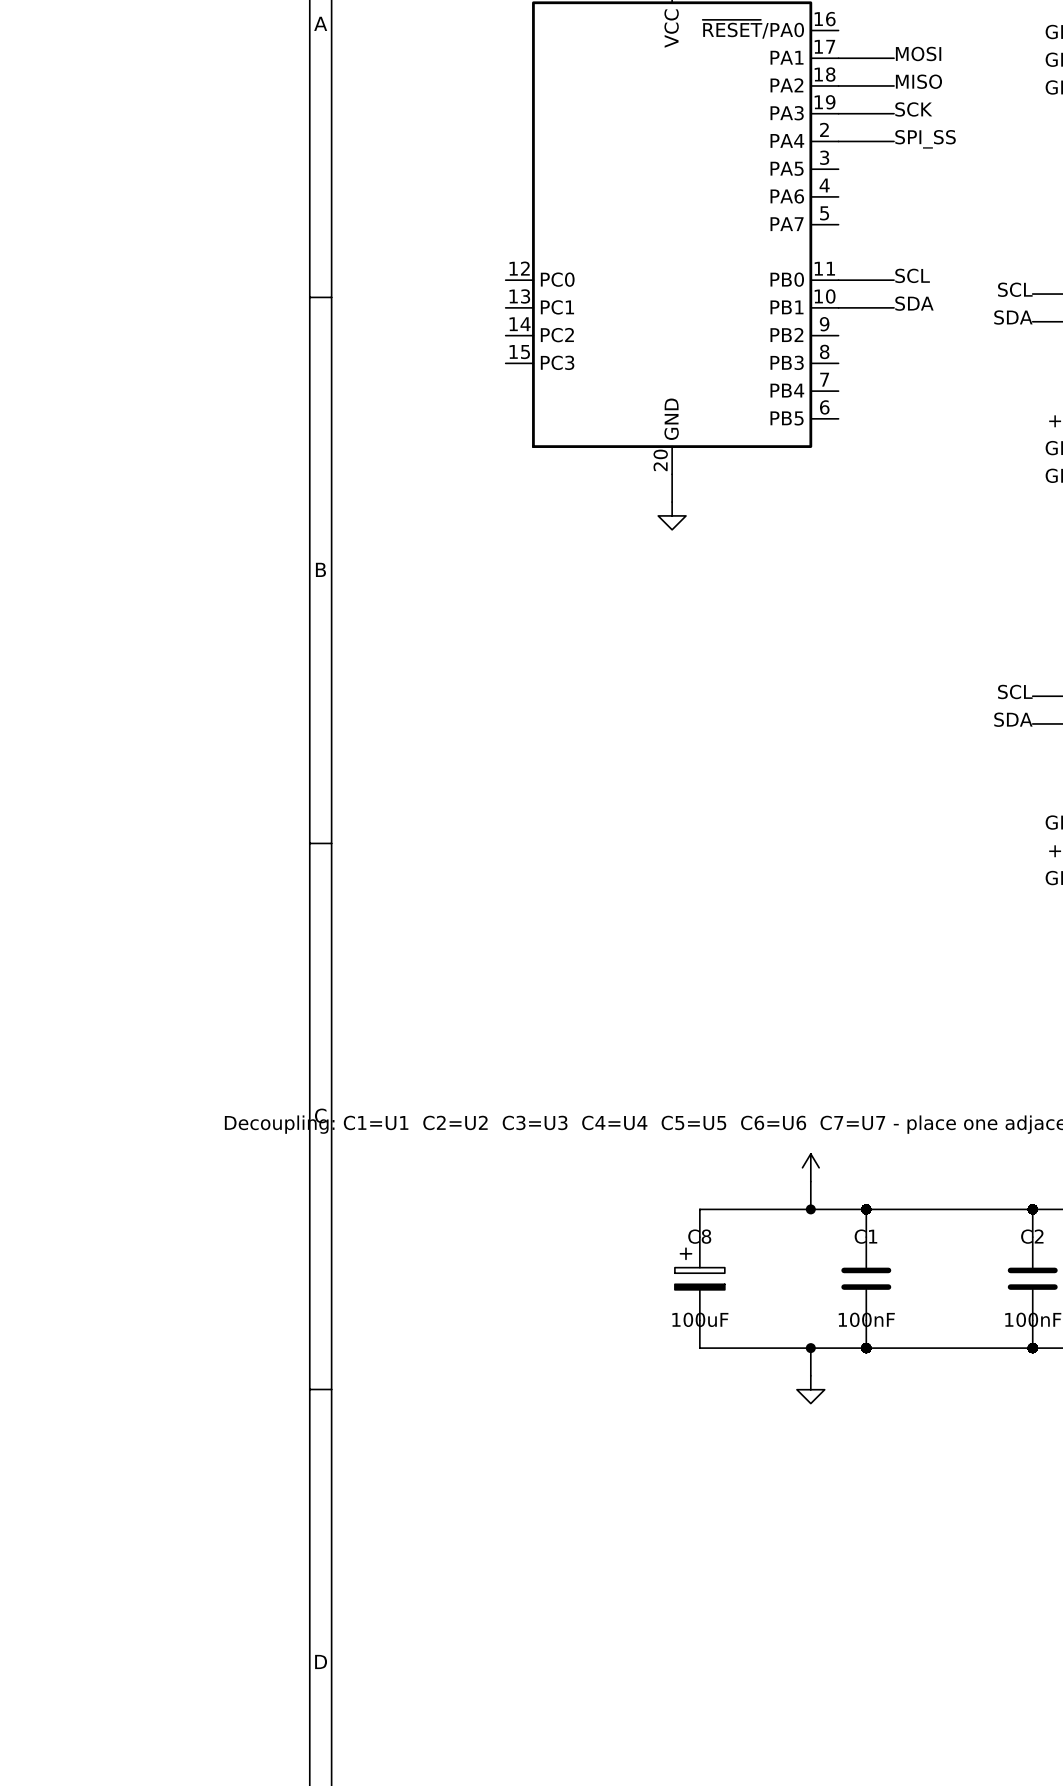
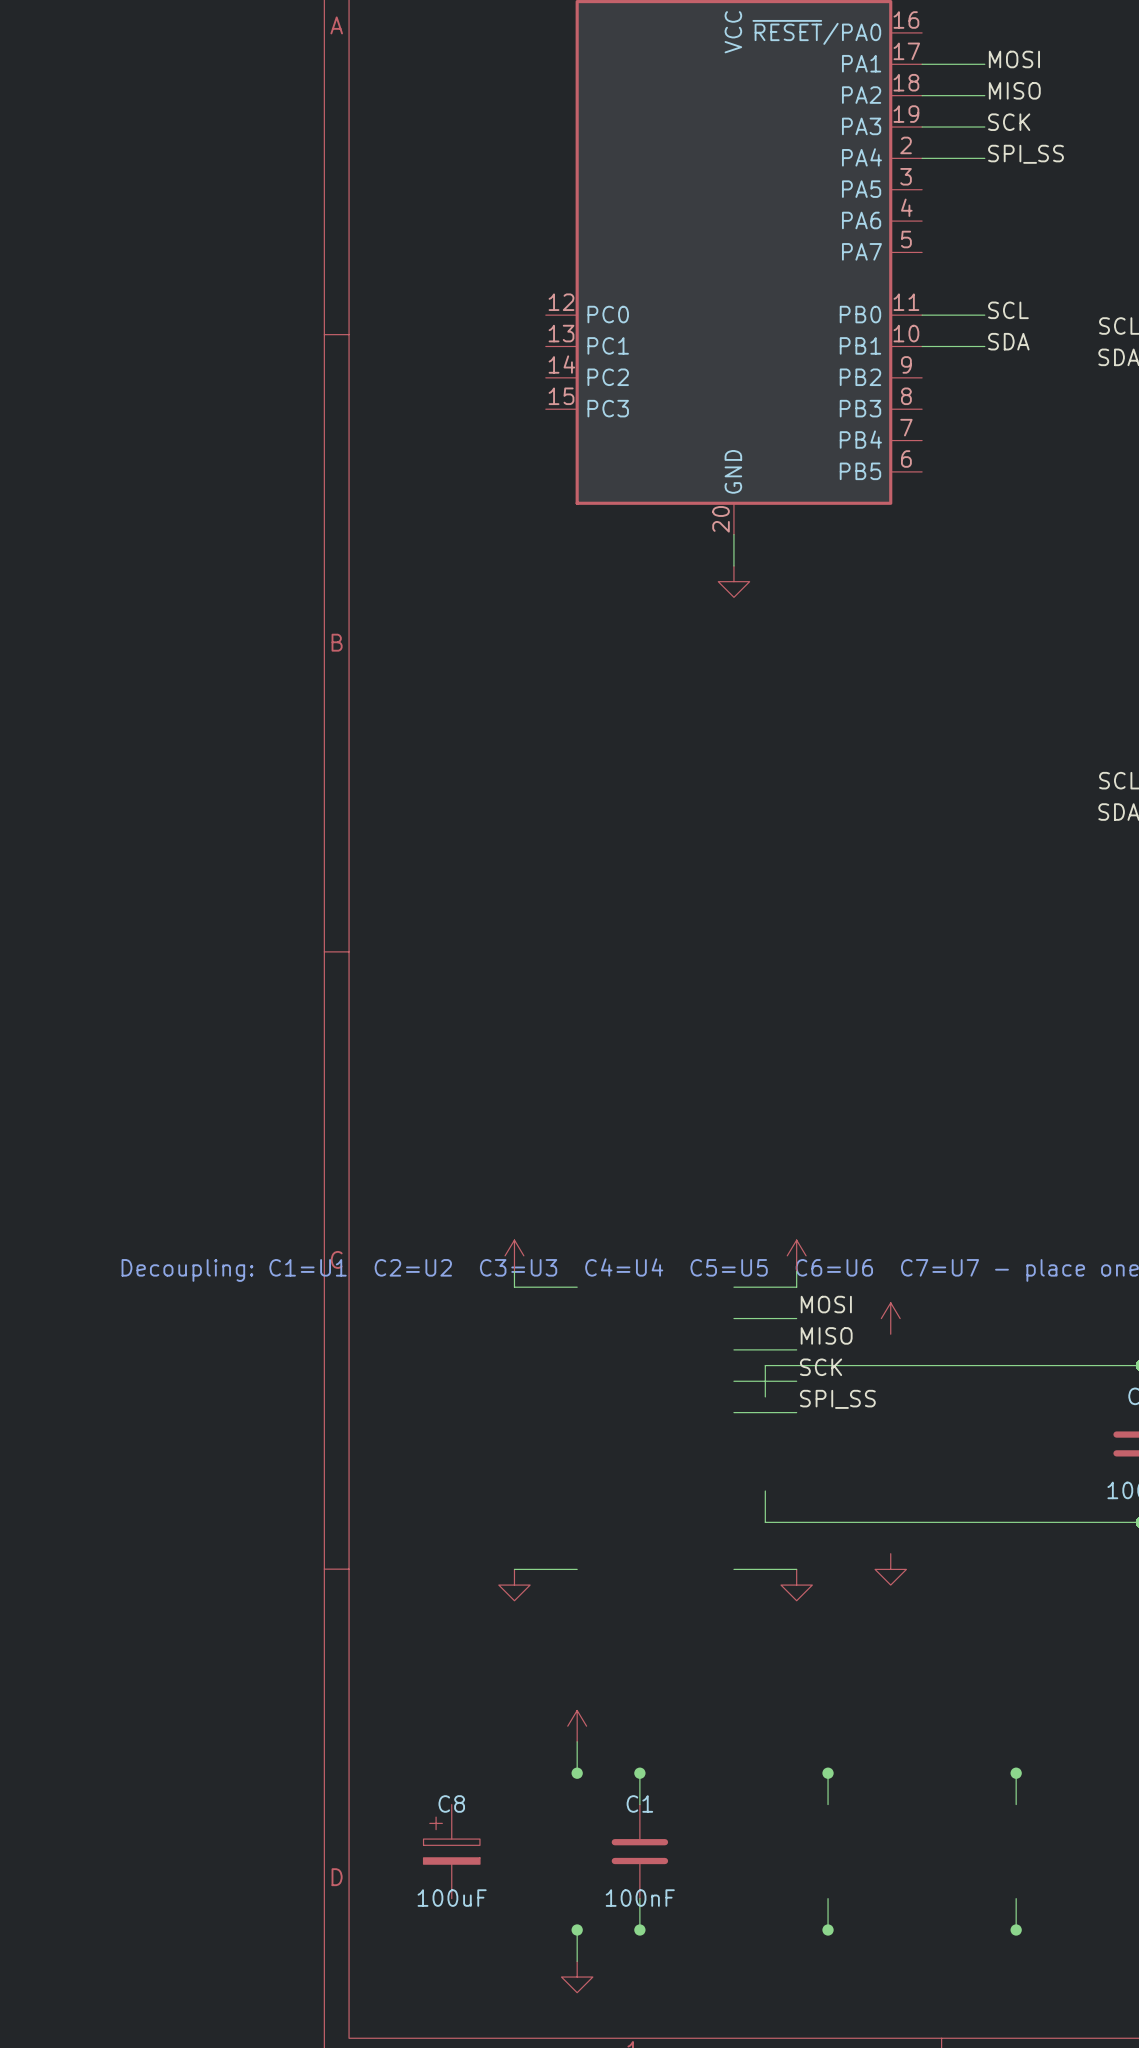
power symbol: none -> (514, 1255)
power symbol: none -> (796, 1255)
wire: none -> (514, 1271) (514, 1287) (577, 1287)
wire: none -> (796, 1271) (796, 1287) (733, 1287)
label: none -> MOSI (826, 1304)
wire: none -> (733, 1318) (796, 1318)
wire: (810, 1181) (810, 1209) -> none
label: none -> MISO (826, 1335)
wire: none -> (733, 1349) (796, 1349)
junction: (810, 1209) -> none
wire: (866, 1209) (866, 1237) -> none
junction: (866, 1209) -> none
label: none -> SCK (821, 1367)
wire: none -> (733, 1381) (796, 1381)
label: none -> SPI_SS (837, 1399)
wire: none -> (733, 1412) (796, 1412)
C8 position: (699, 1278) -> (451, 1851)
C1 position: (866, 1278) -> (639, 1851)
wire: (866, 1320) (866, 1348) -> (1016, 1773) (1016, 1804)
wire: (810, 1348) (810, 1375) -> (828, 1773) (828, 1804)
junction: (810, 1348) -> none
junction: (866, 1348) -> none
wire: none -> (514, 1569) (577, 1569)
wire: none -> (733, 1569) (796, 1569)
power symbol: none -> (514, 1585)
power symbol: none -> (796, 1585)
power symbol: none -> (577, 1726)
wire: none -> (577, 1741) (577, 1773)
junction: none -> (577, 1773)
wire: none -> (639, 1773) (639, 1804)
junction: none -> (639, 1773)
junction: none -> (828, 1773)
junction: none -> (1016, 1773)
wire: none -> (639, 1898) (639, 1929)
wire: none -> (828, 1898) (828, 1929)
wire: none -> (1016, 1898) (1016, 1929)
wire: none -> (577, 1929) (577, 1961)
junction: none -> (577, 1929)
junction: none -> (639, 1929)
junction: none -> (828, 1929)
junction: none -> (1016, 1929)
power symbol: none -> (577, 1977)

